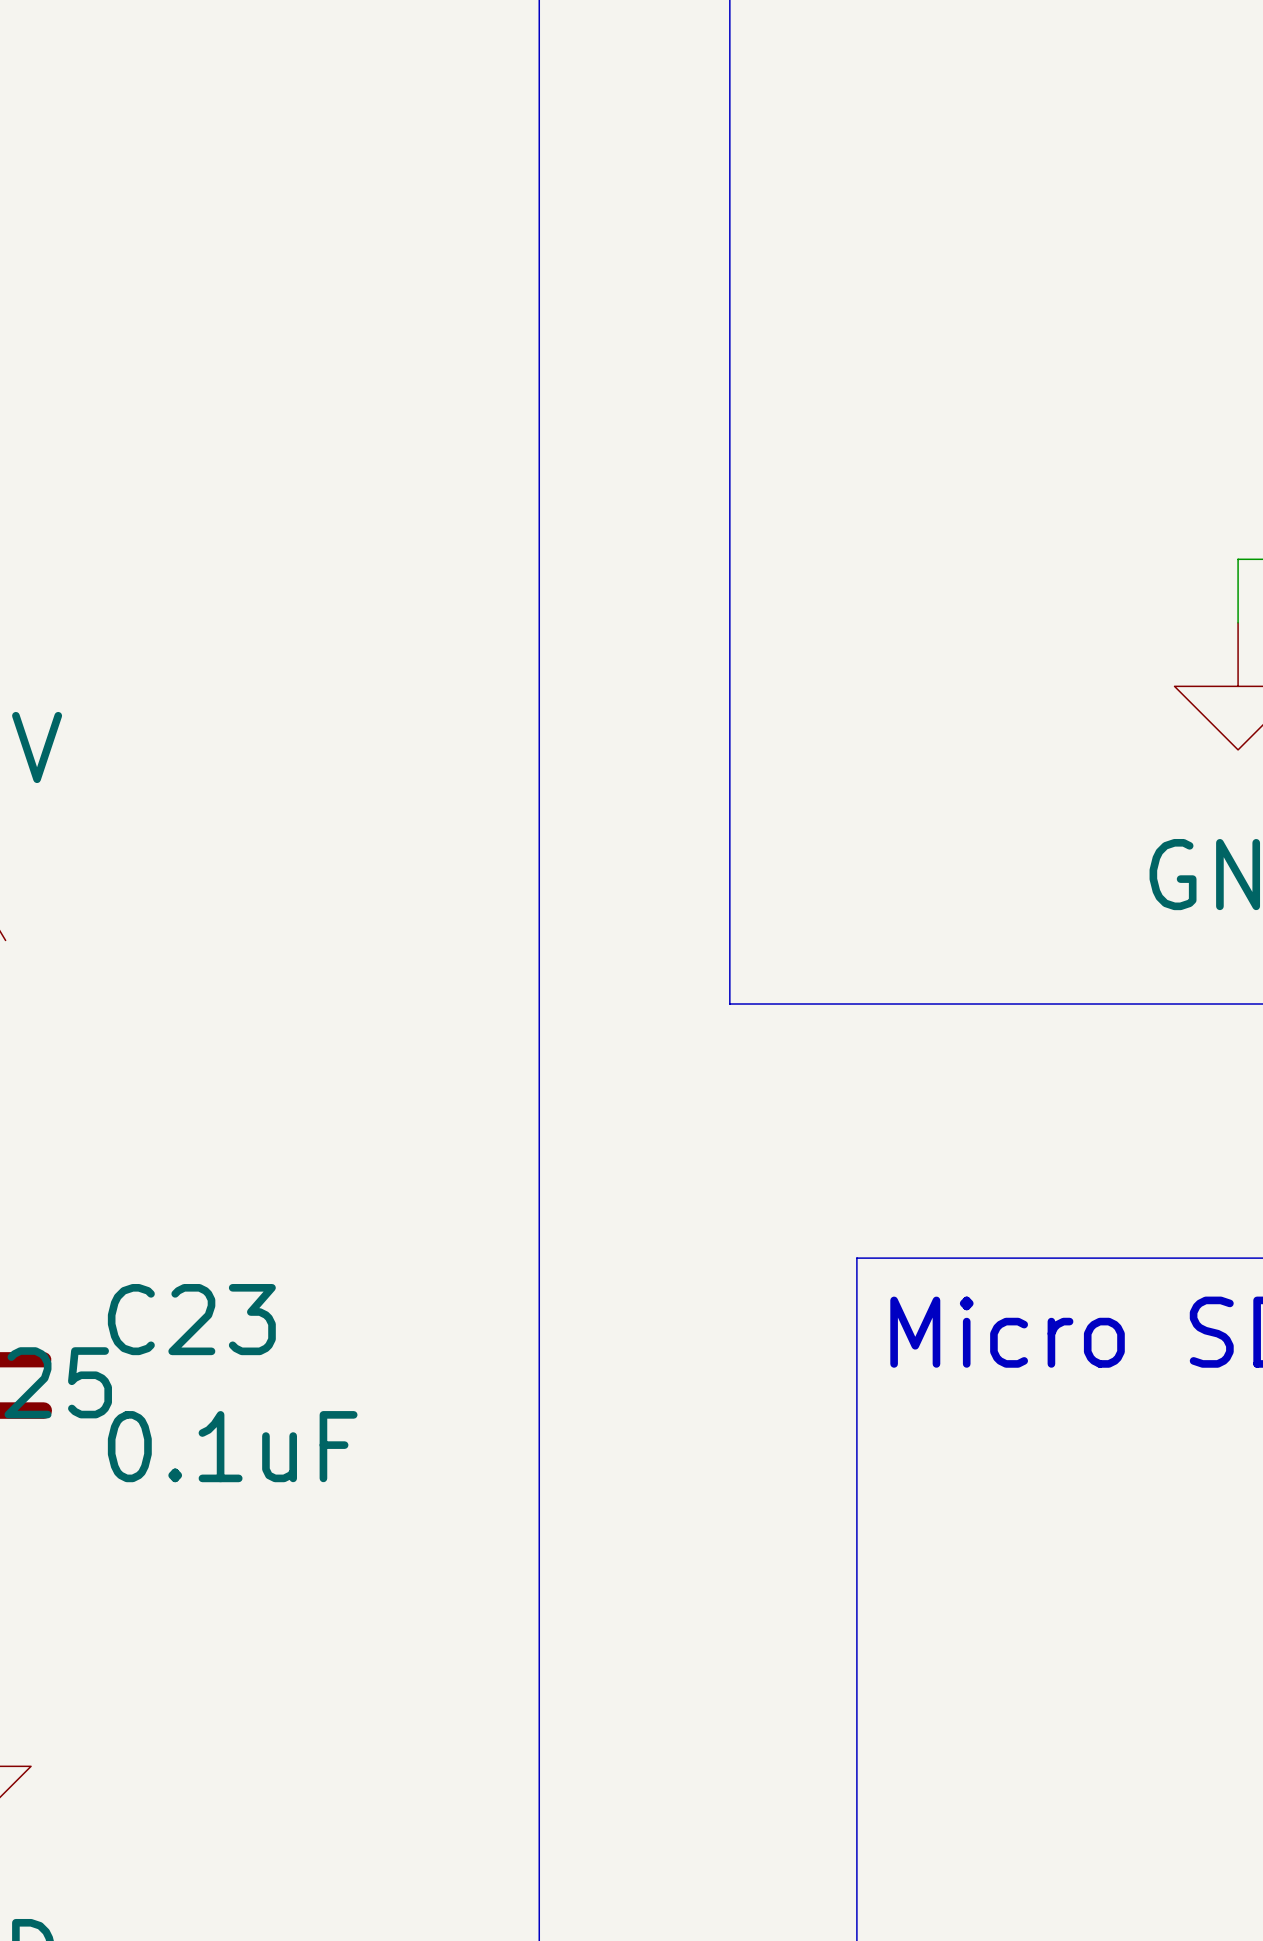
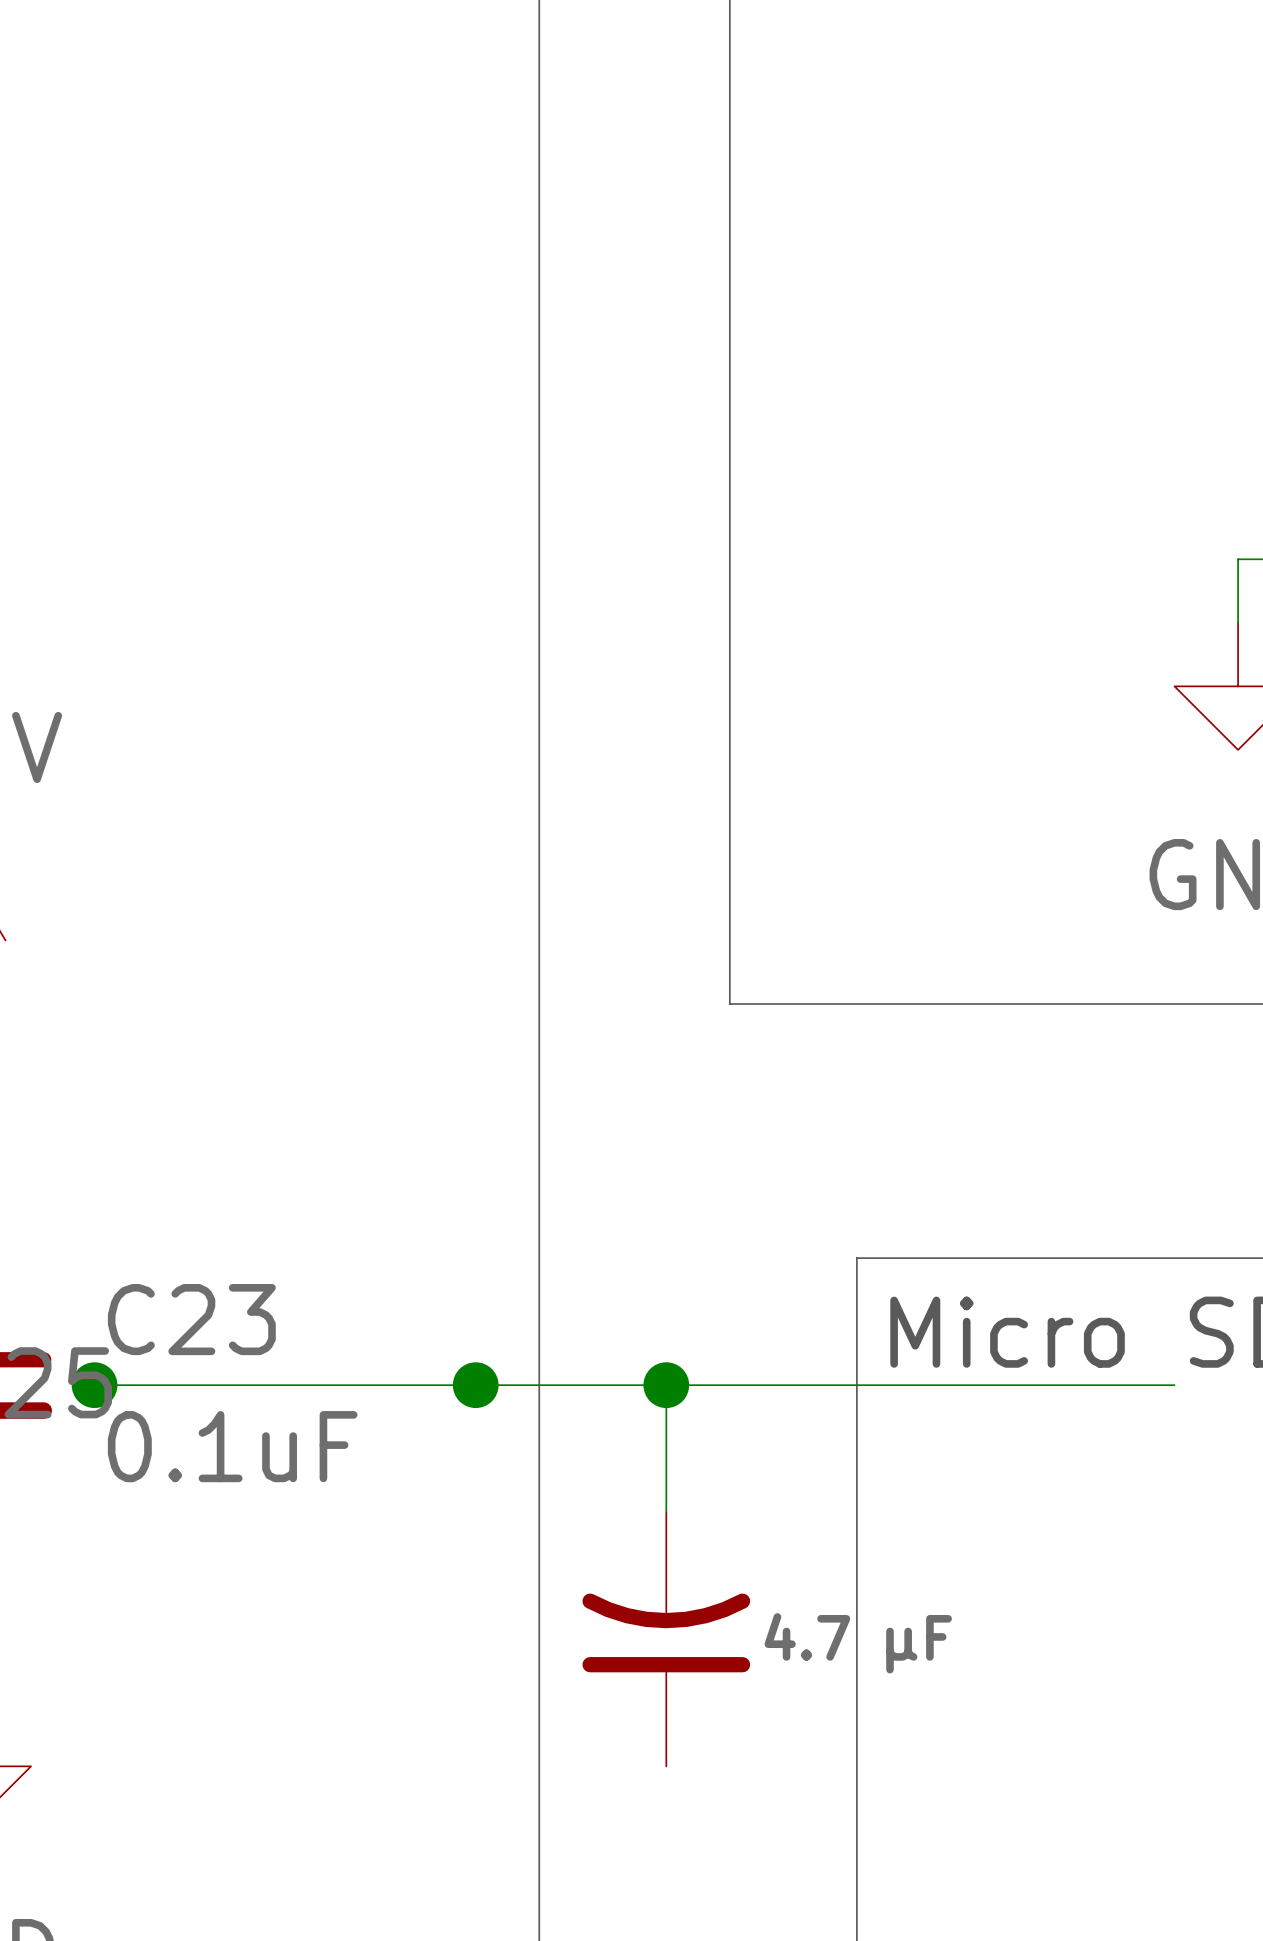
wire: none -> (94, 1385) (1174, 1385)
junction: none -> (94, 1385)
junction: none -> (475, 1385)
wire: none -> (666, 1385) (666, 1512)
junction: none -> (666, 1385)
part: none -> 4.7 µF (666, 1639)

